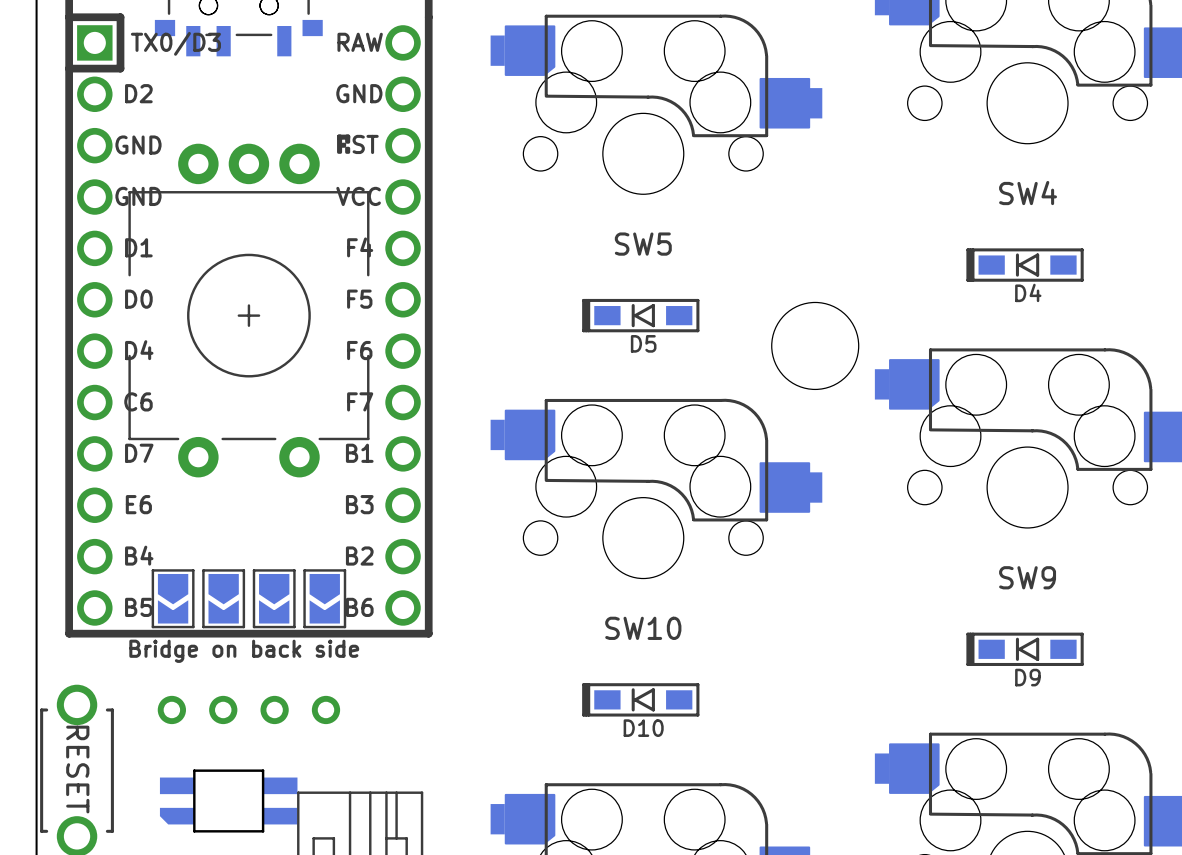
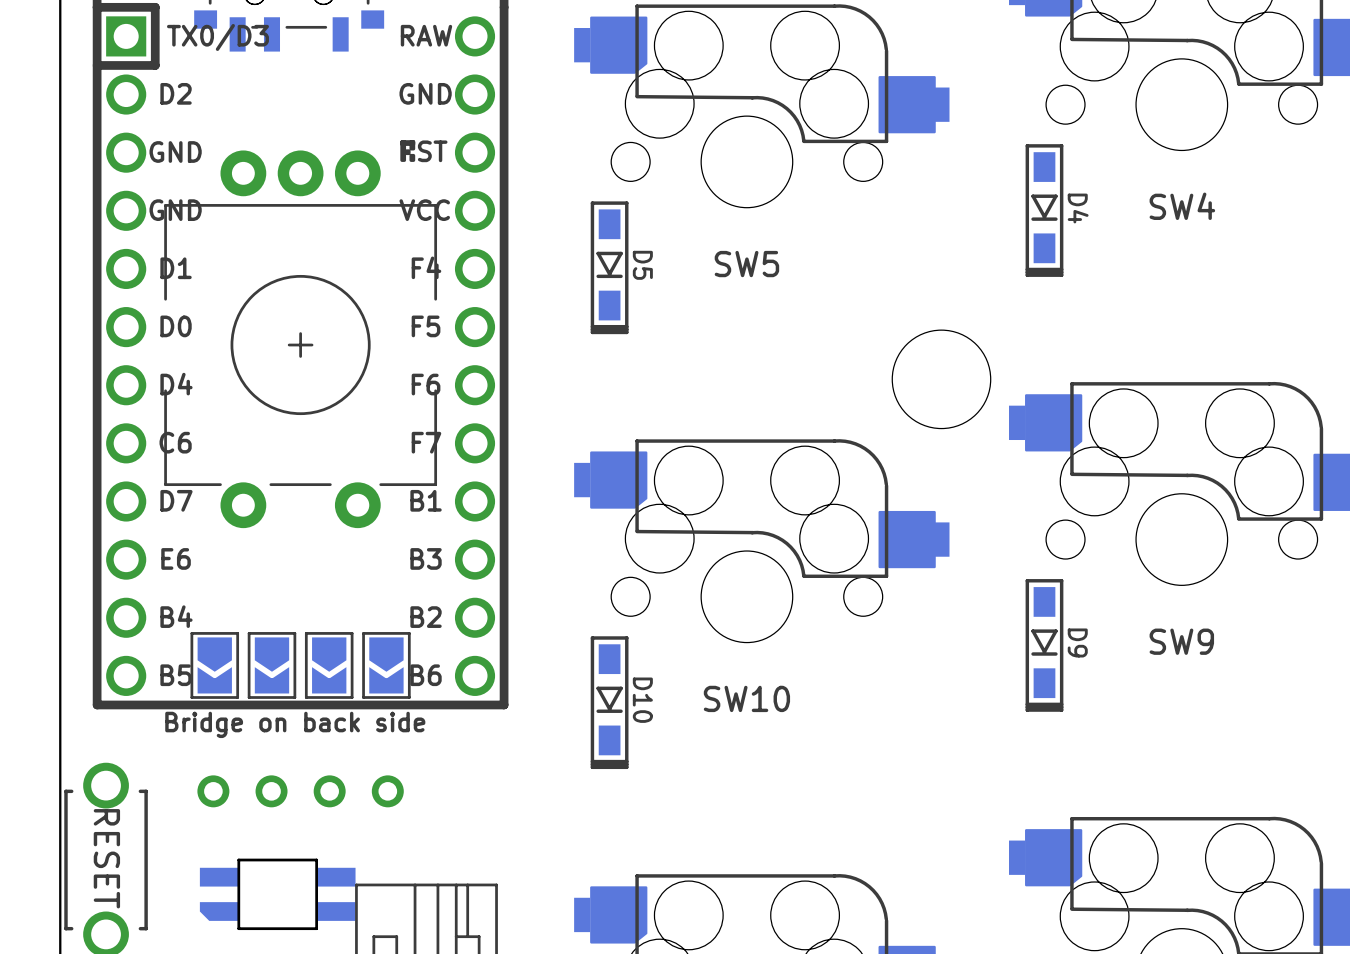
D4 rotation: 0° (1025, 265) -> 90° counterclockwise (1044, 210)
D4 position: (1025, 265) -> (1044, 210)
D5 rotation: 0° (640, 315) -> 90° counterclockwise (609, 267)
D5 position: (640, 315) -> (609, 267)
D9 rotation: 0° (1025, 649) -> 90° counterclockwise (1044, 645)
D9 position: (1025, 649) -> (1044, 645)
D10 rotation: 0° (640, 699) -> 90° counterclockwise (609, 702)
D10 position: (640, 699) -> (609, 702)

